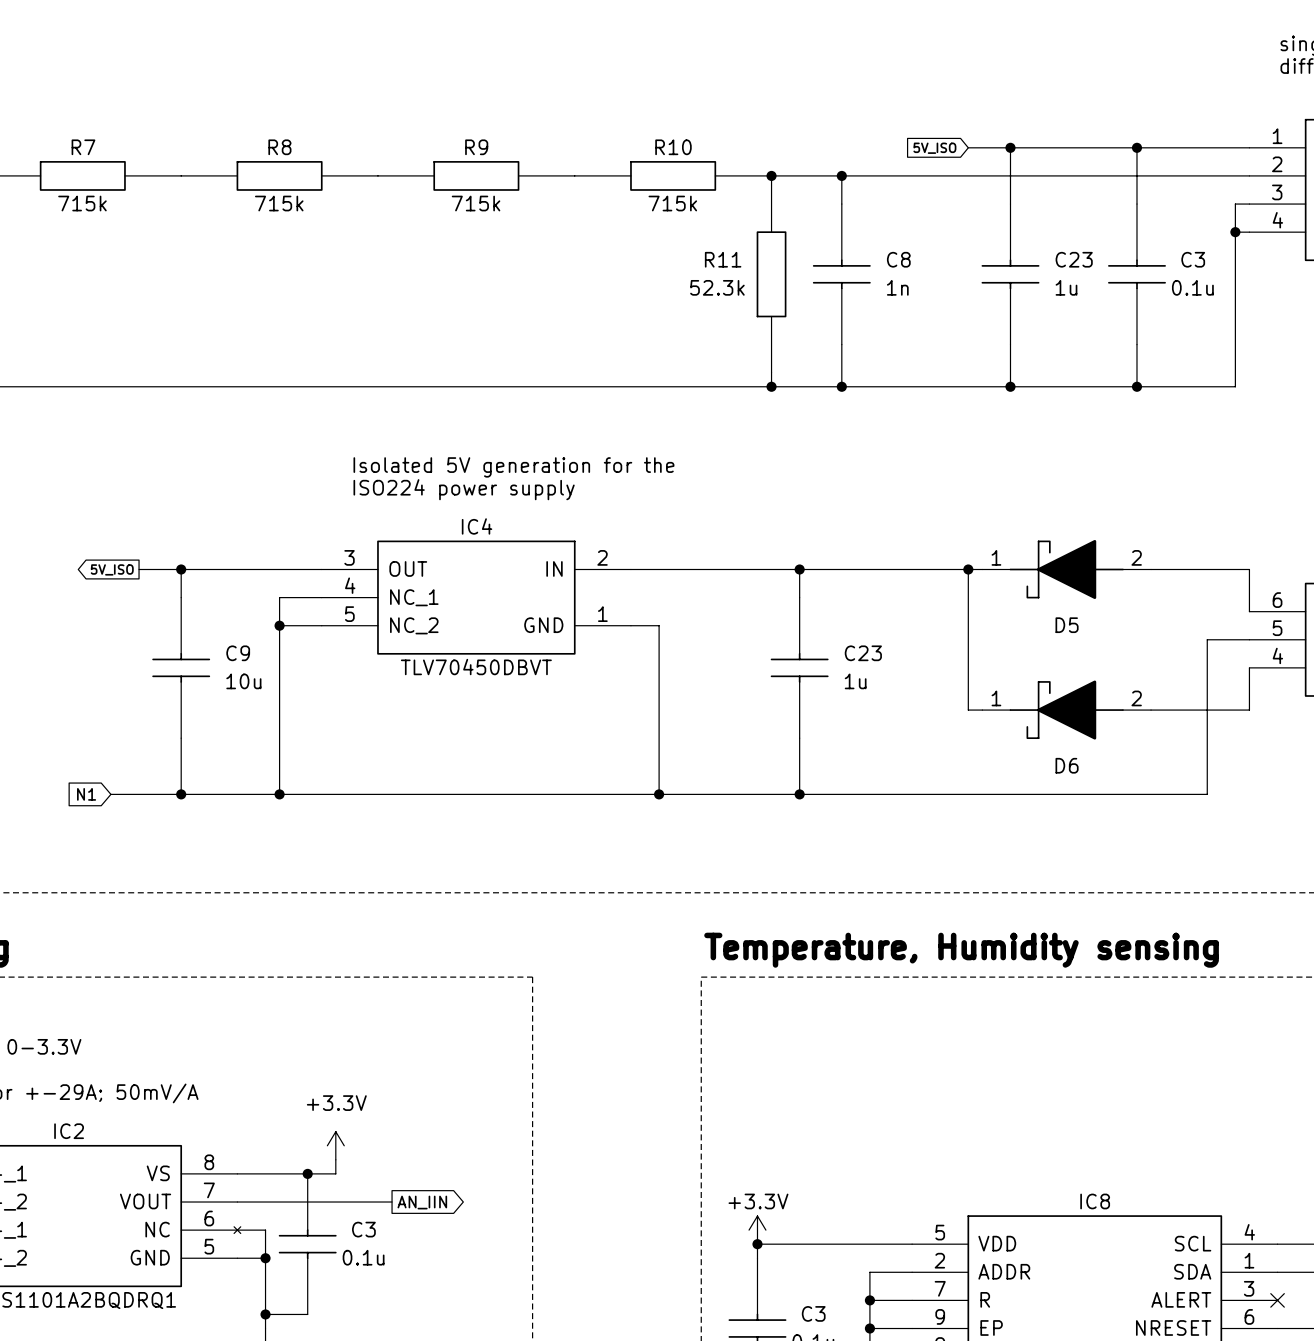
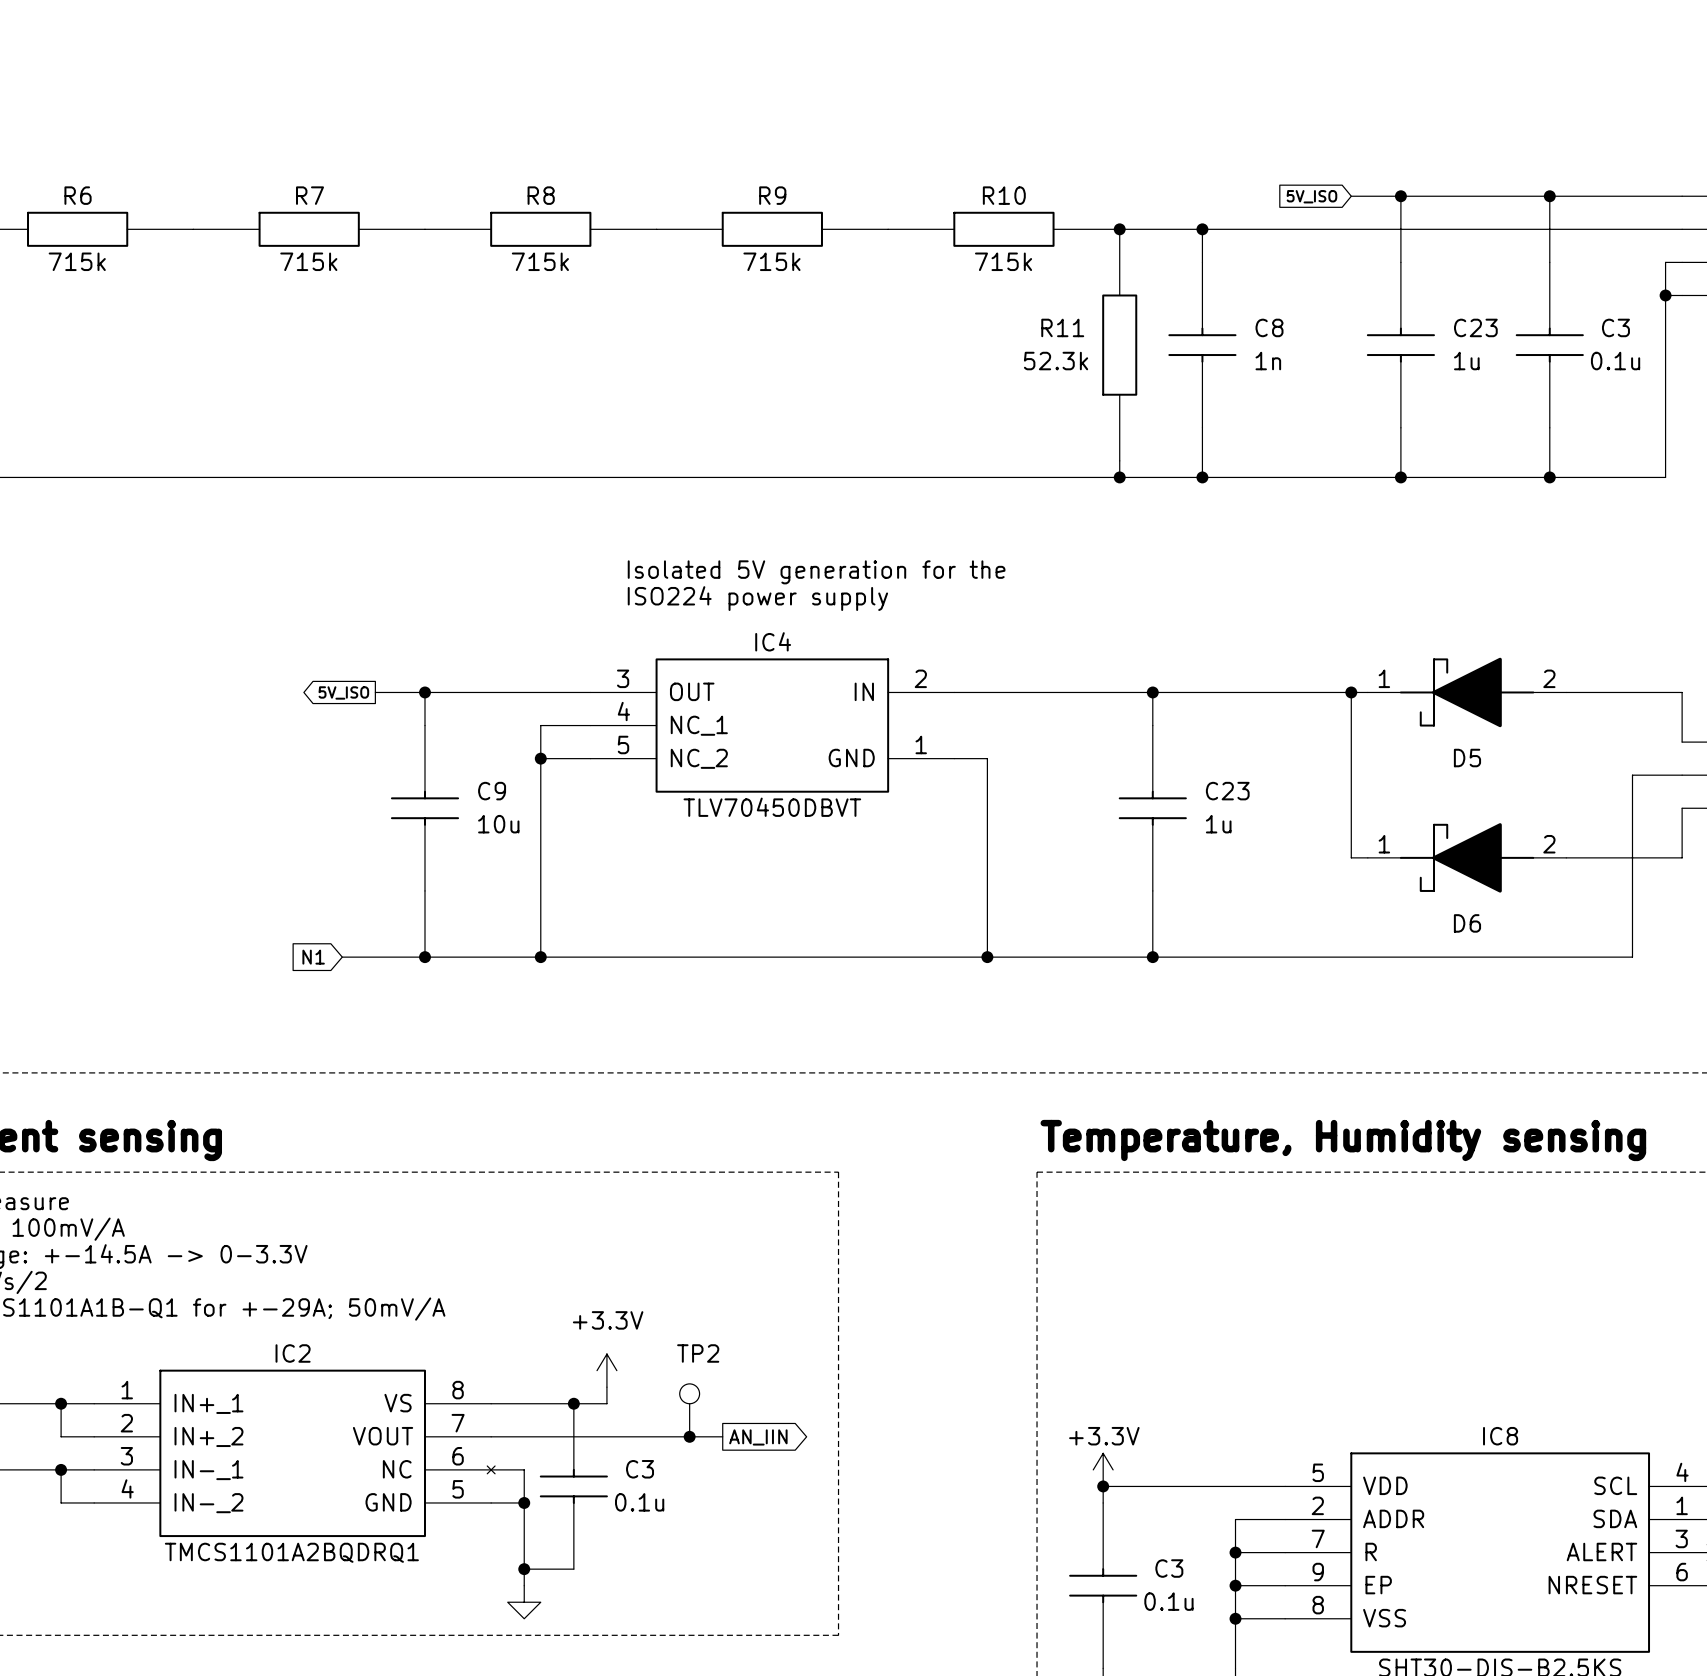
TP2: none -> (689, 1410)
wire: none -> (673, 1436) (722, 1436)
junction: none -> (689, 1436)
global label position: AN_IIN (422, 1202) -> AN_IIN (758, 1437)

